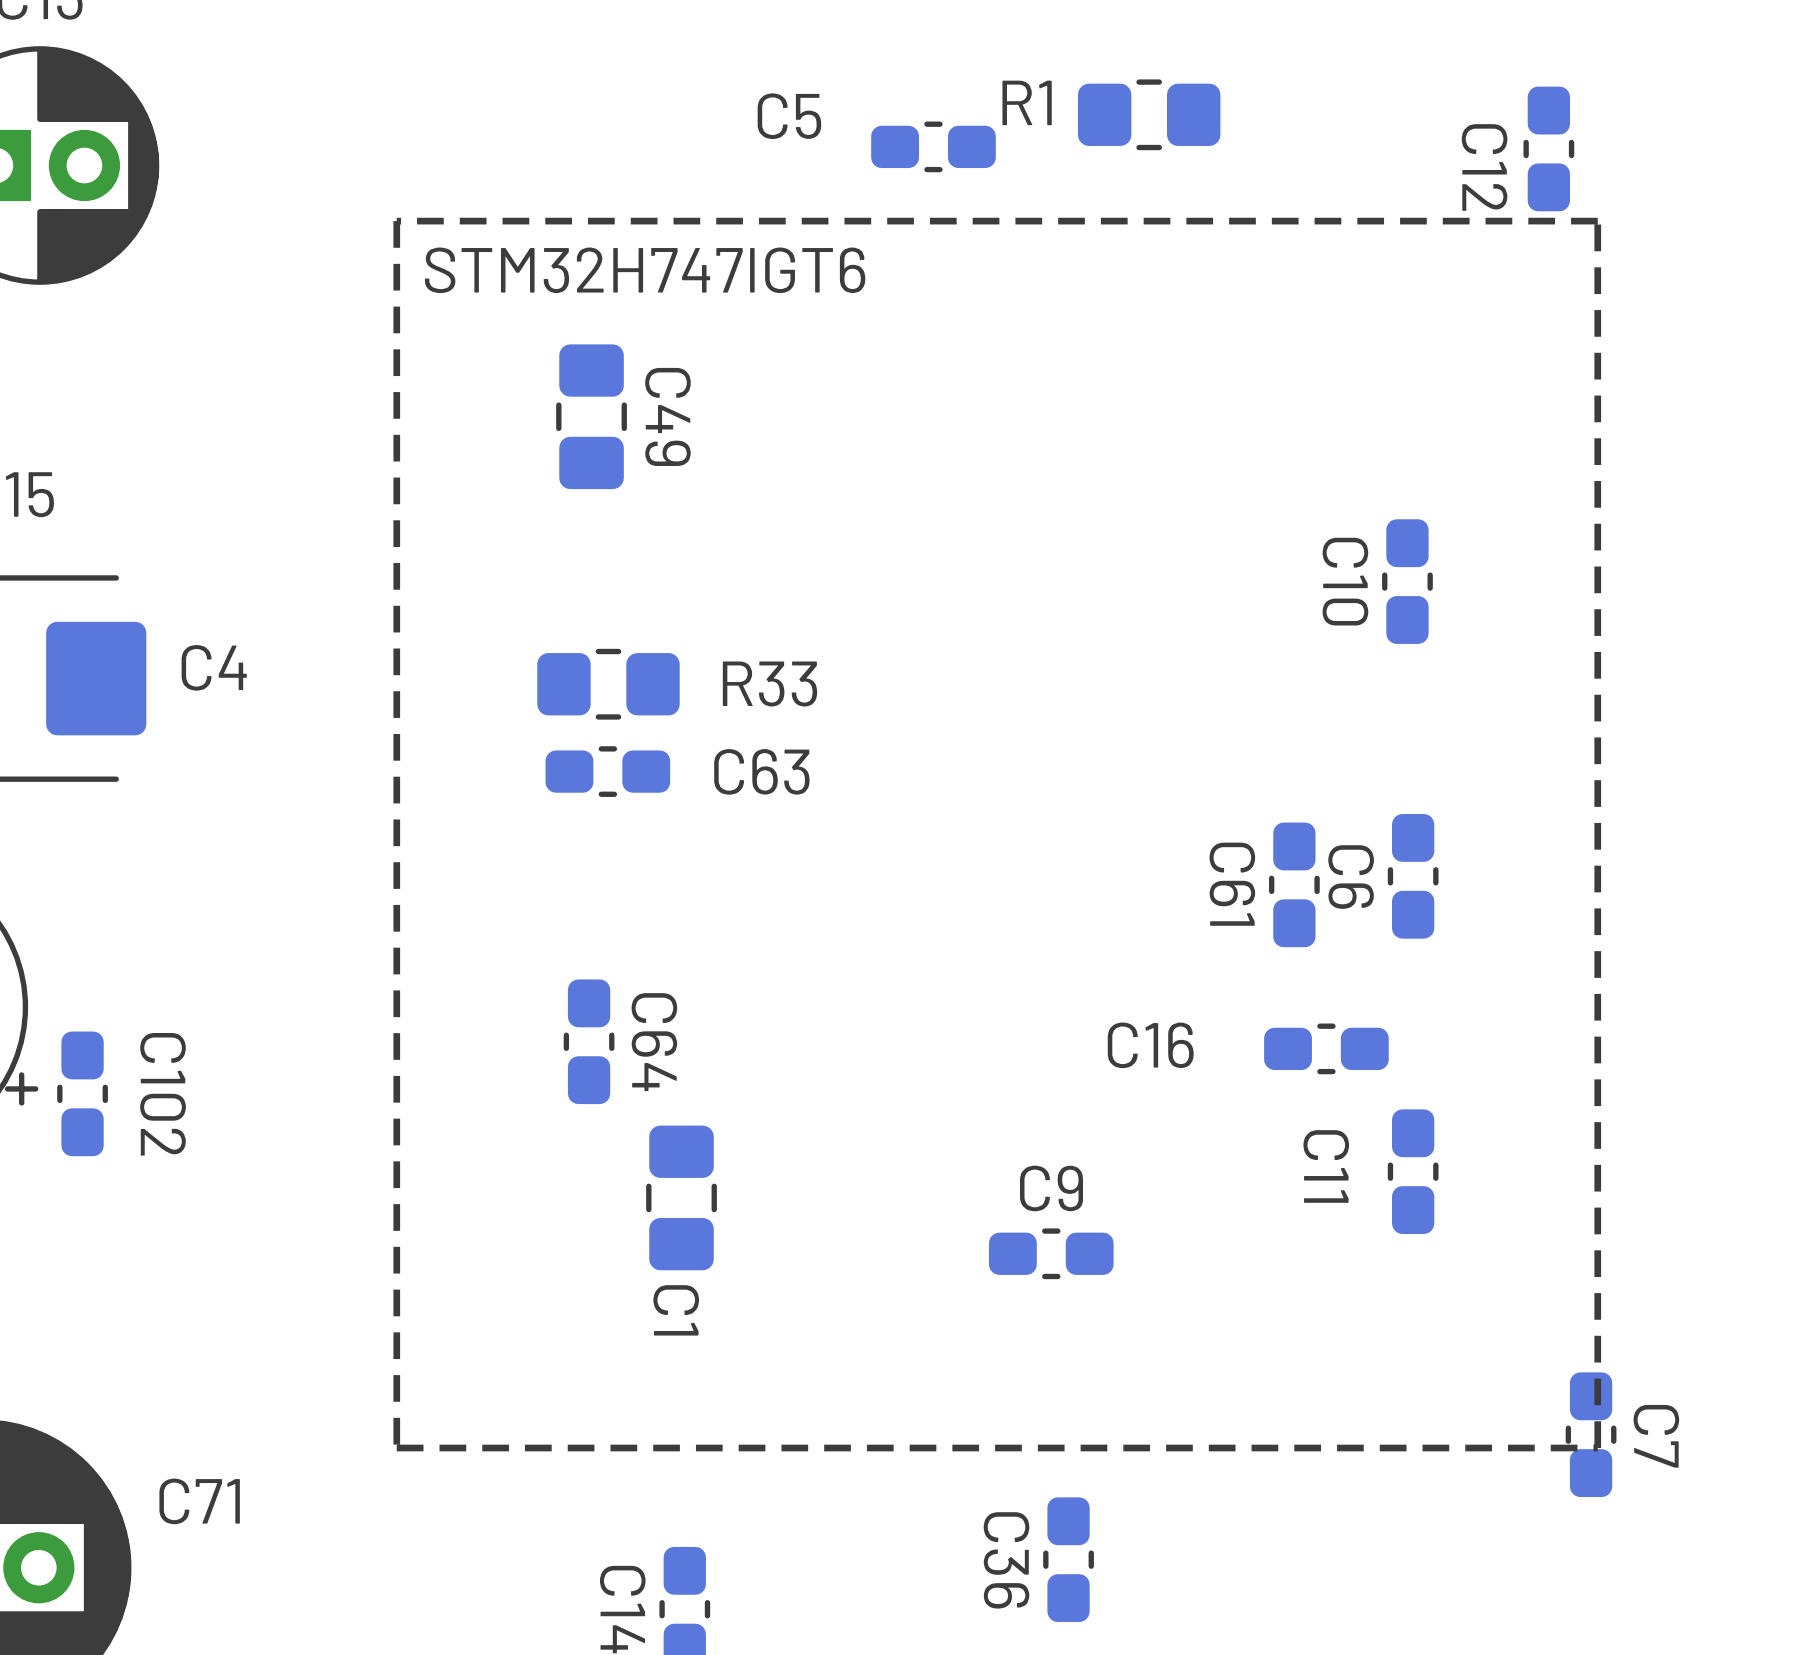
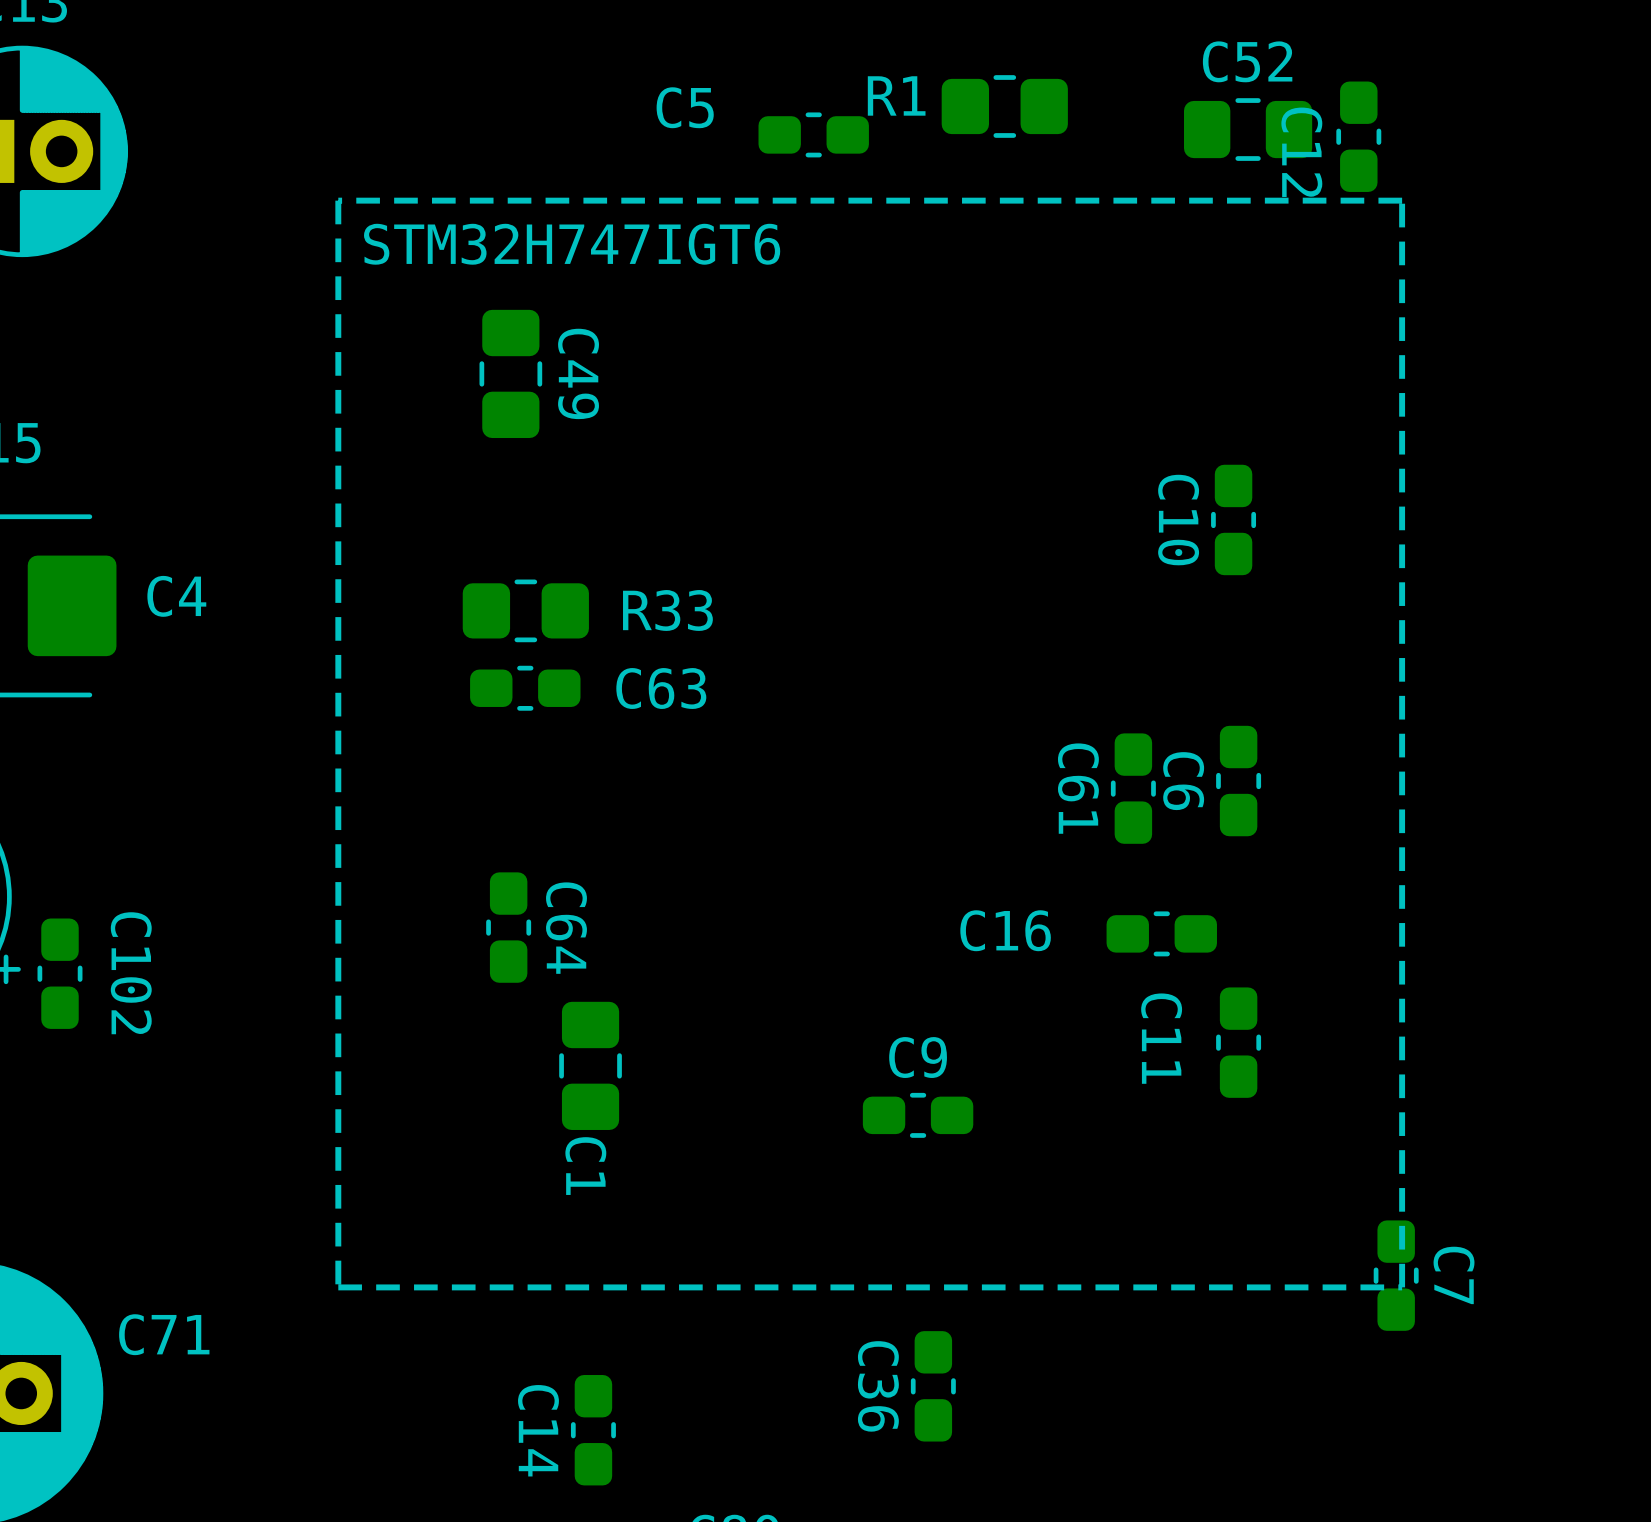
C52: none -> (1248, 129)

